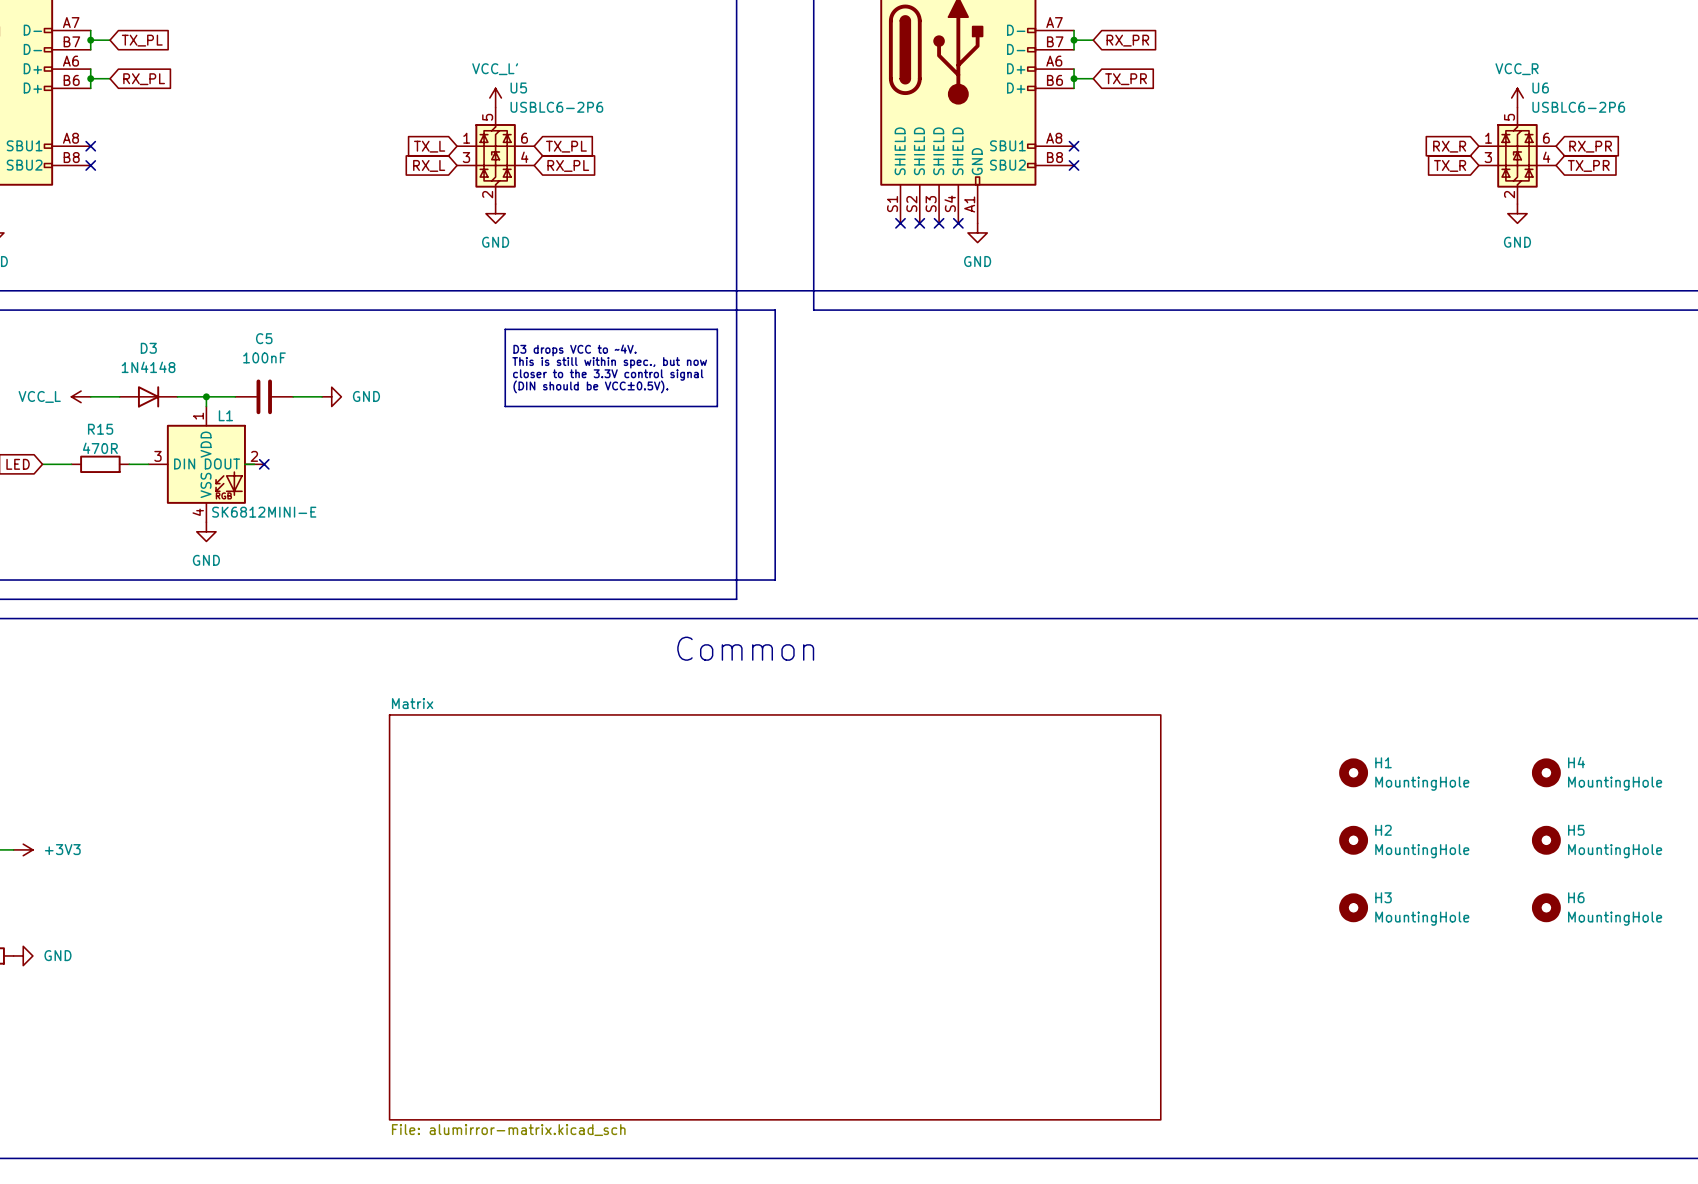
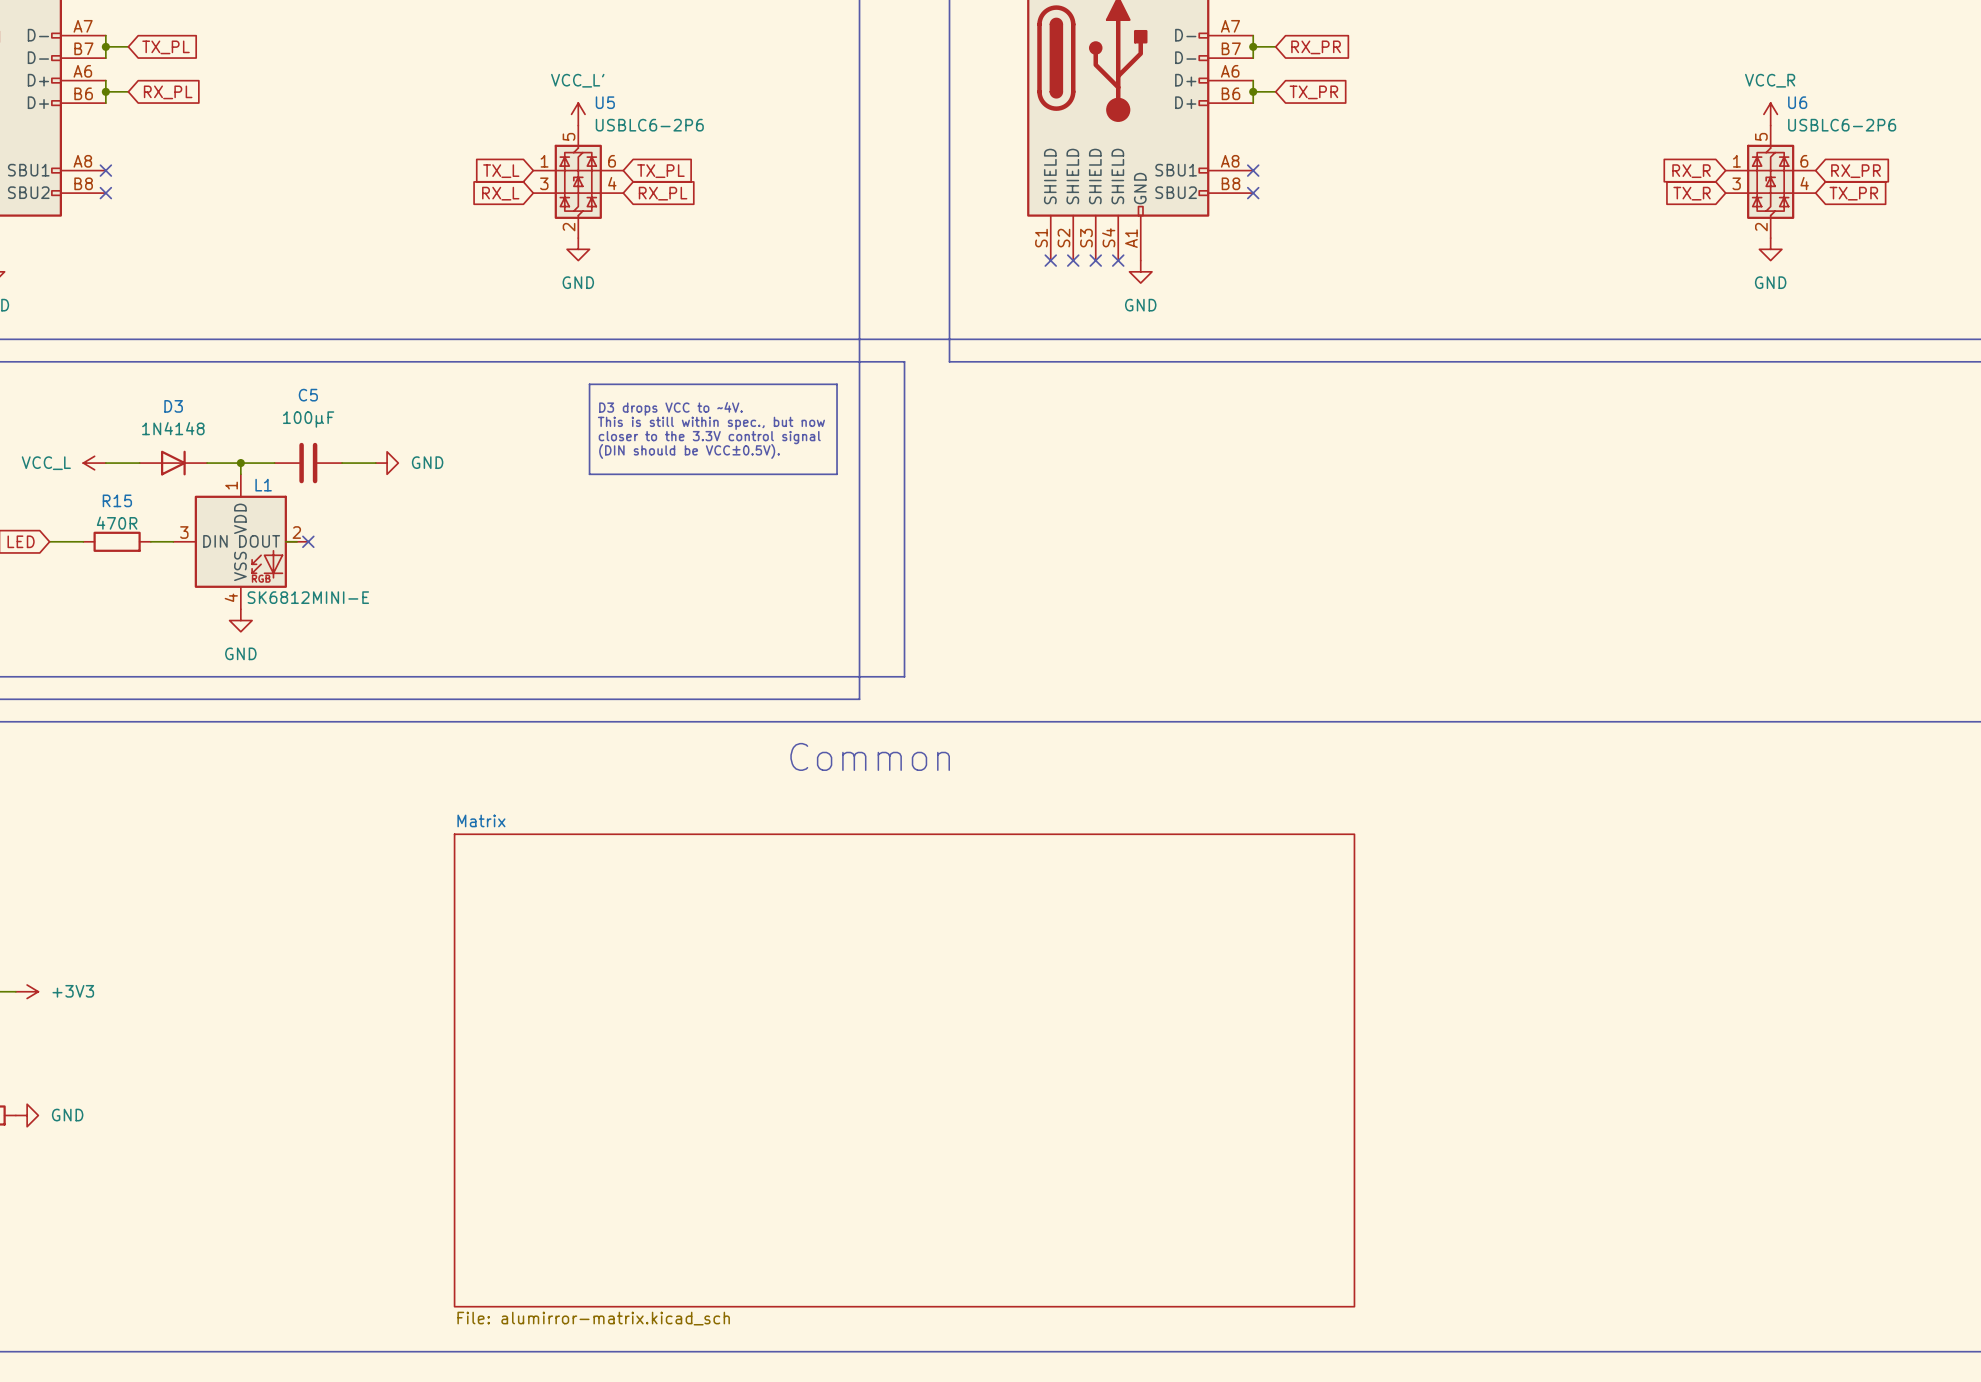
C5 value: 100nF (264, 357) -> 100µF (308, 419)
H1: MountingHole (1353, 772) -> none
H4: MountingHole (1546, 772) -> none
H2: MountingHole (1353, 840) -> none
H5: MountingHole (1546, 840) -> none
H3: MountingHole (1353, 907) -> none
H6: MountingHole (1546, 907) -> none

